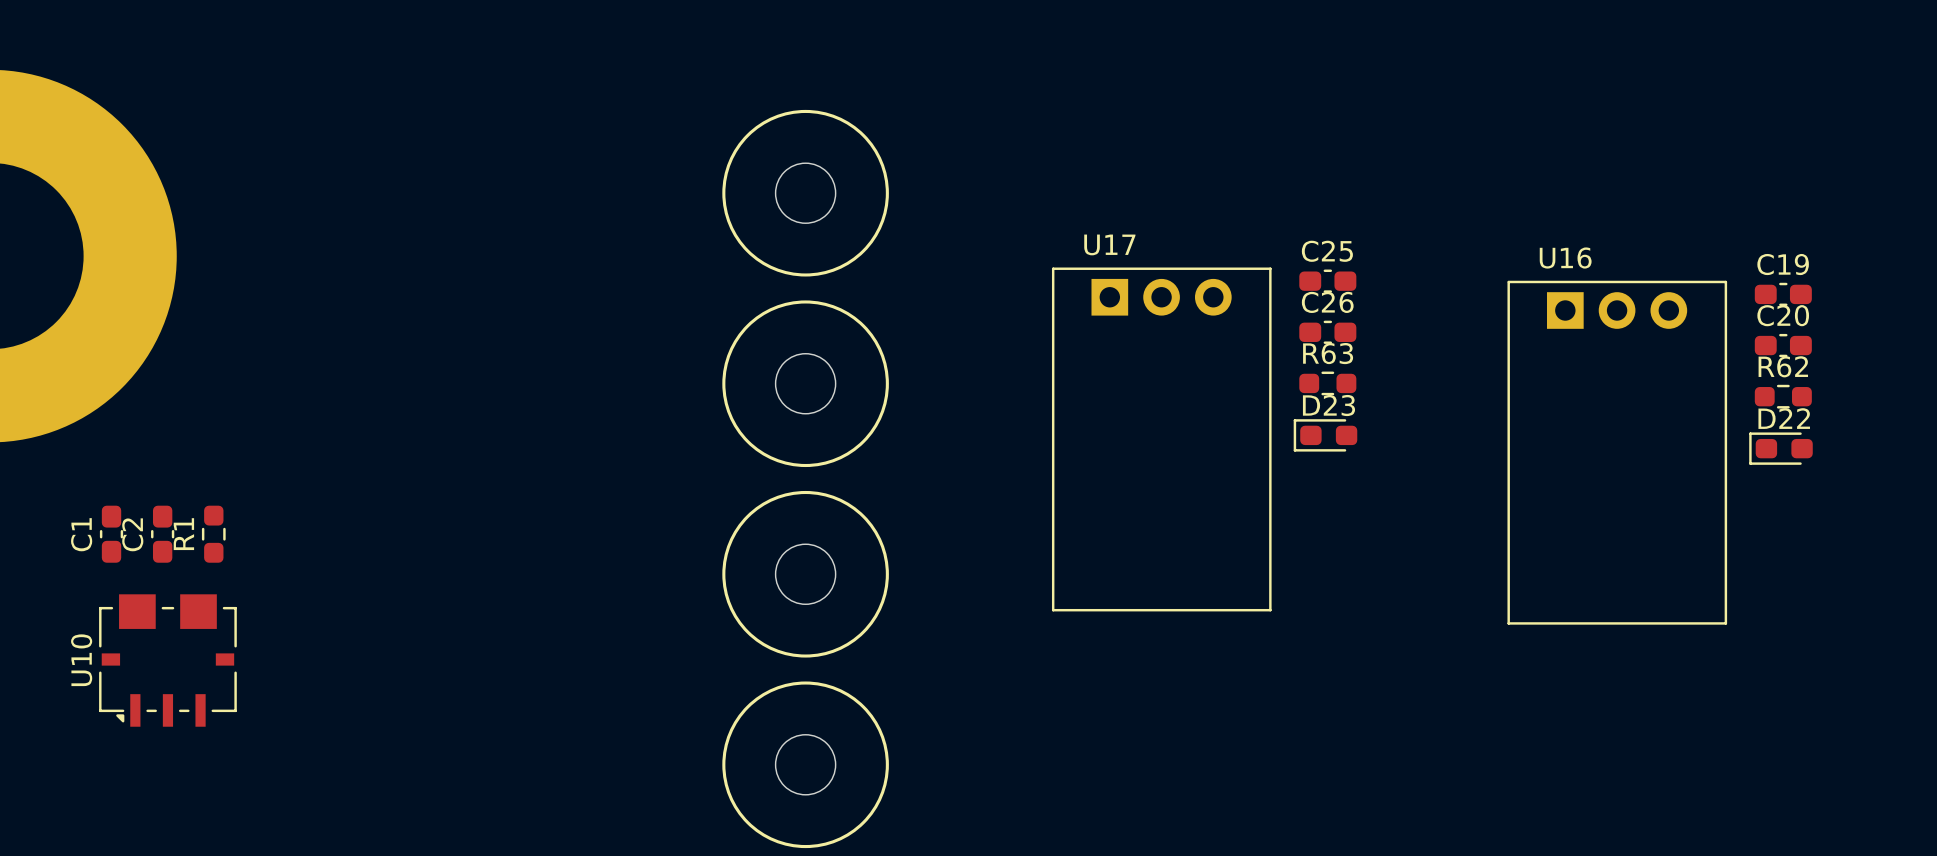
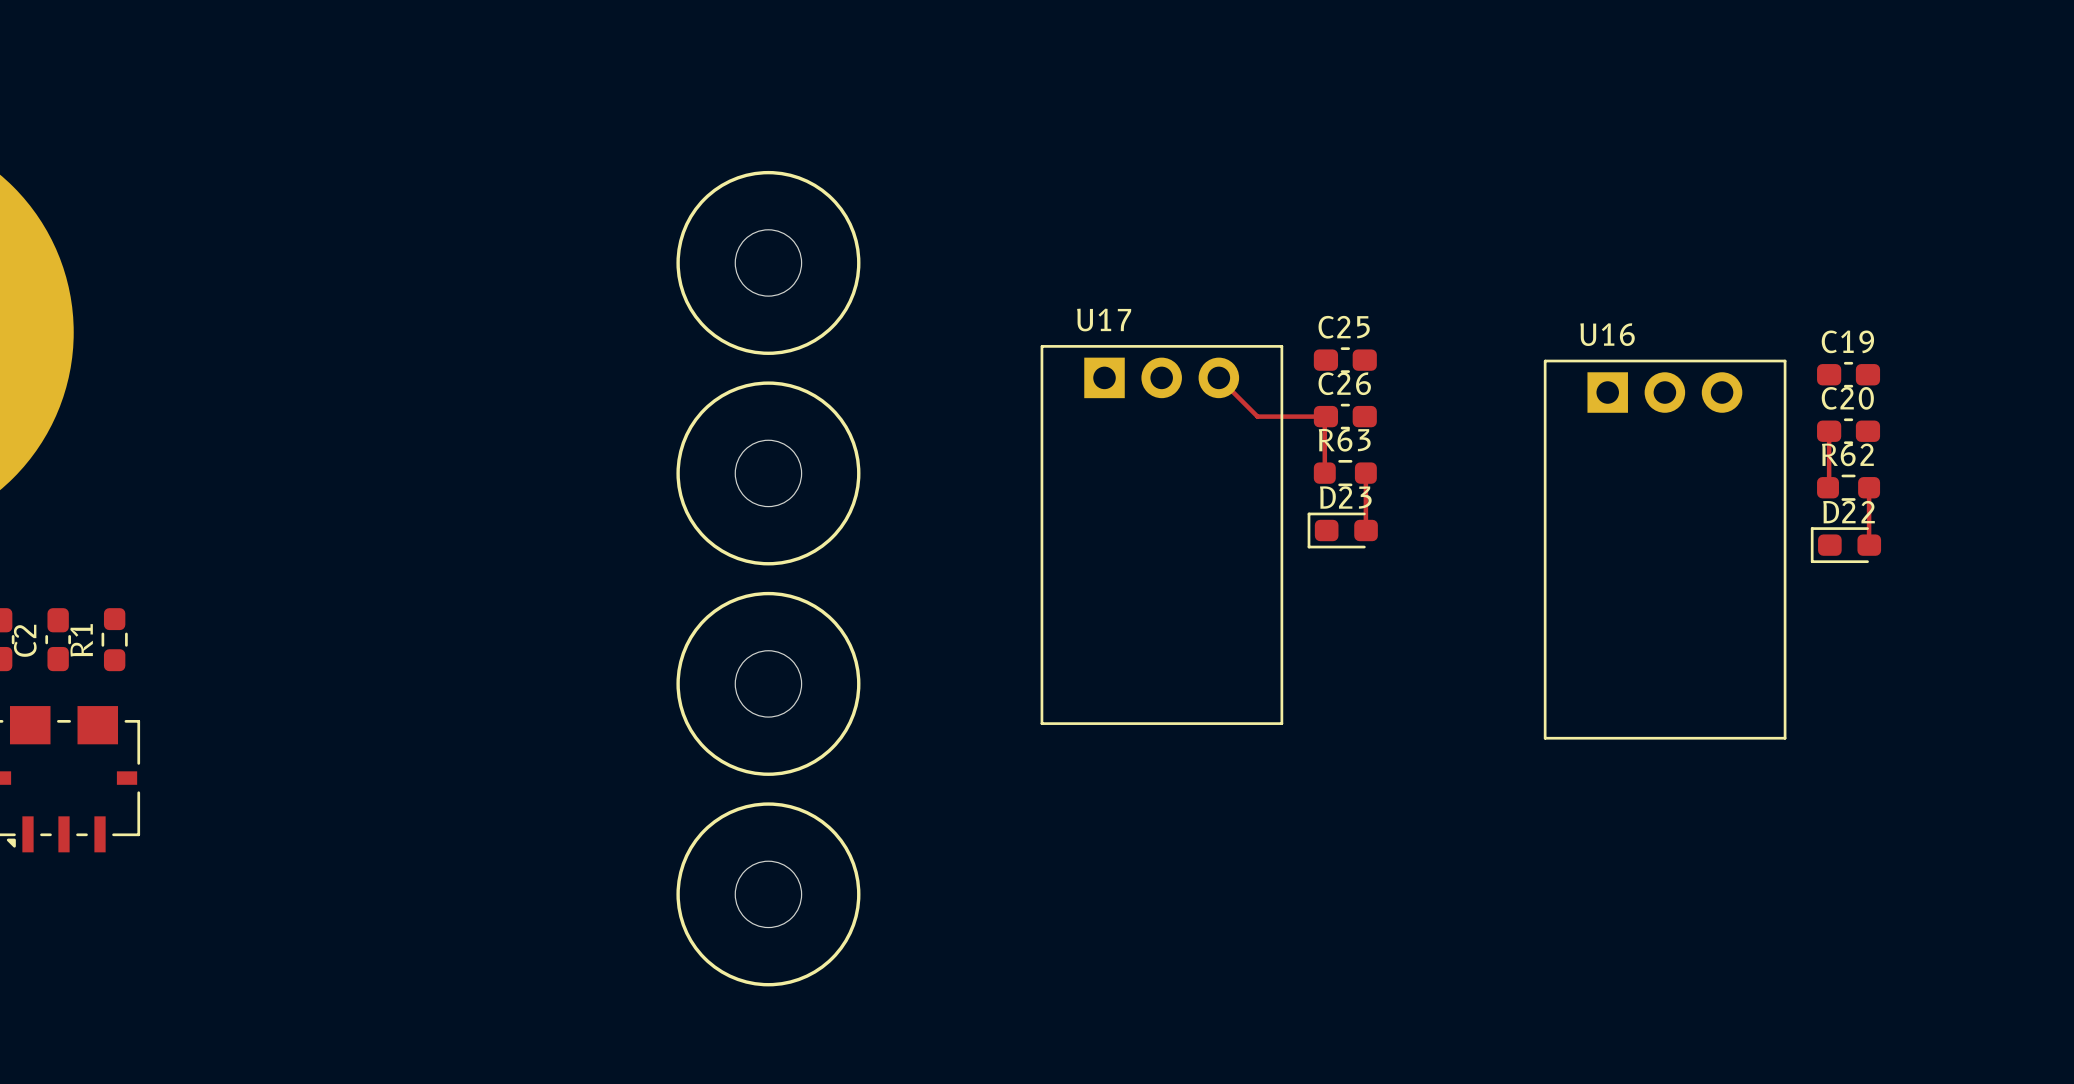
top track: none -> (1218, 377) (1257, 416) (1325, 416) (1324, 473)
top track: none -> (1829, 431) (1828, 487)
top track: none -> (1365, 473) (1365, 530)
top track: none -> (1869, 487) (1869, 544)

